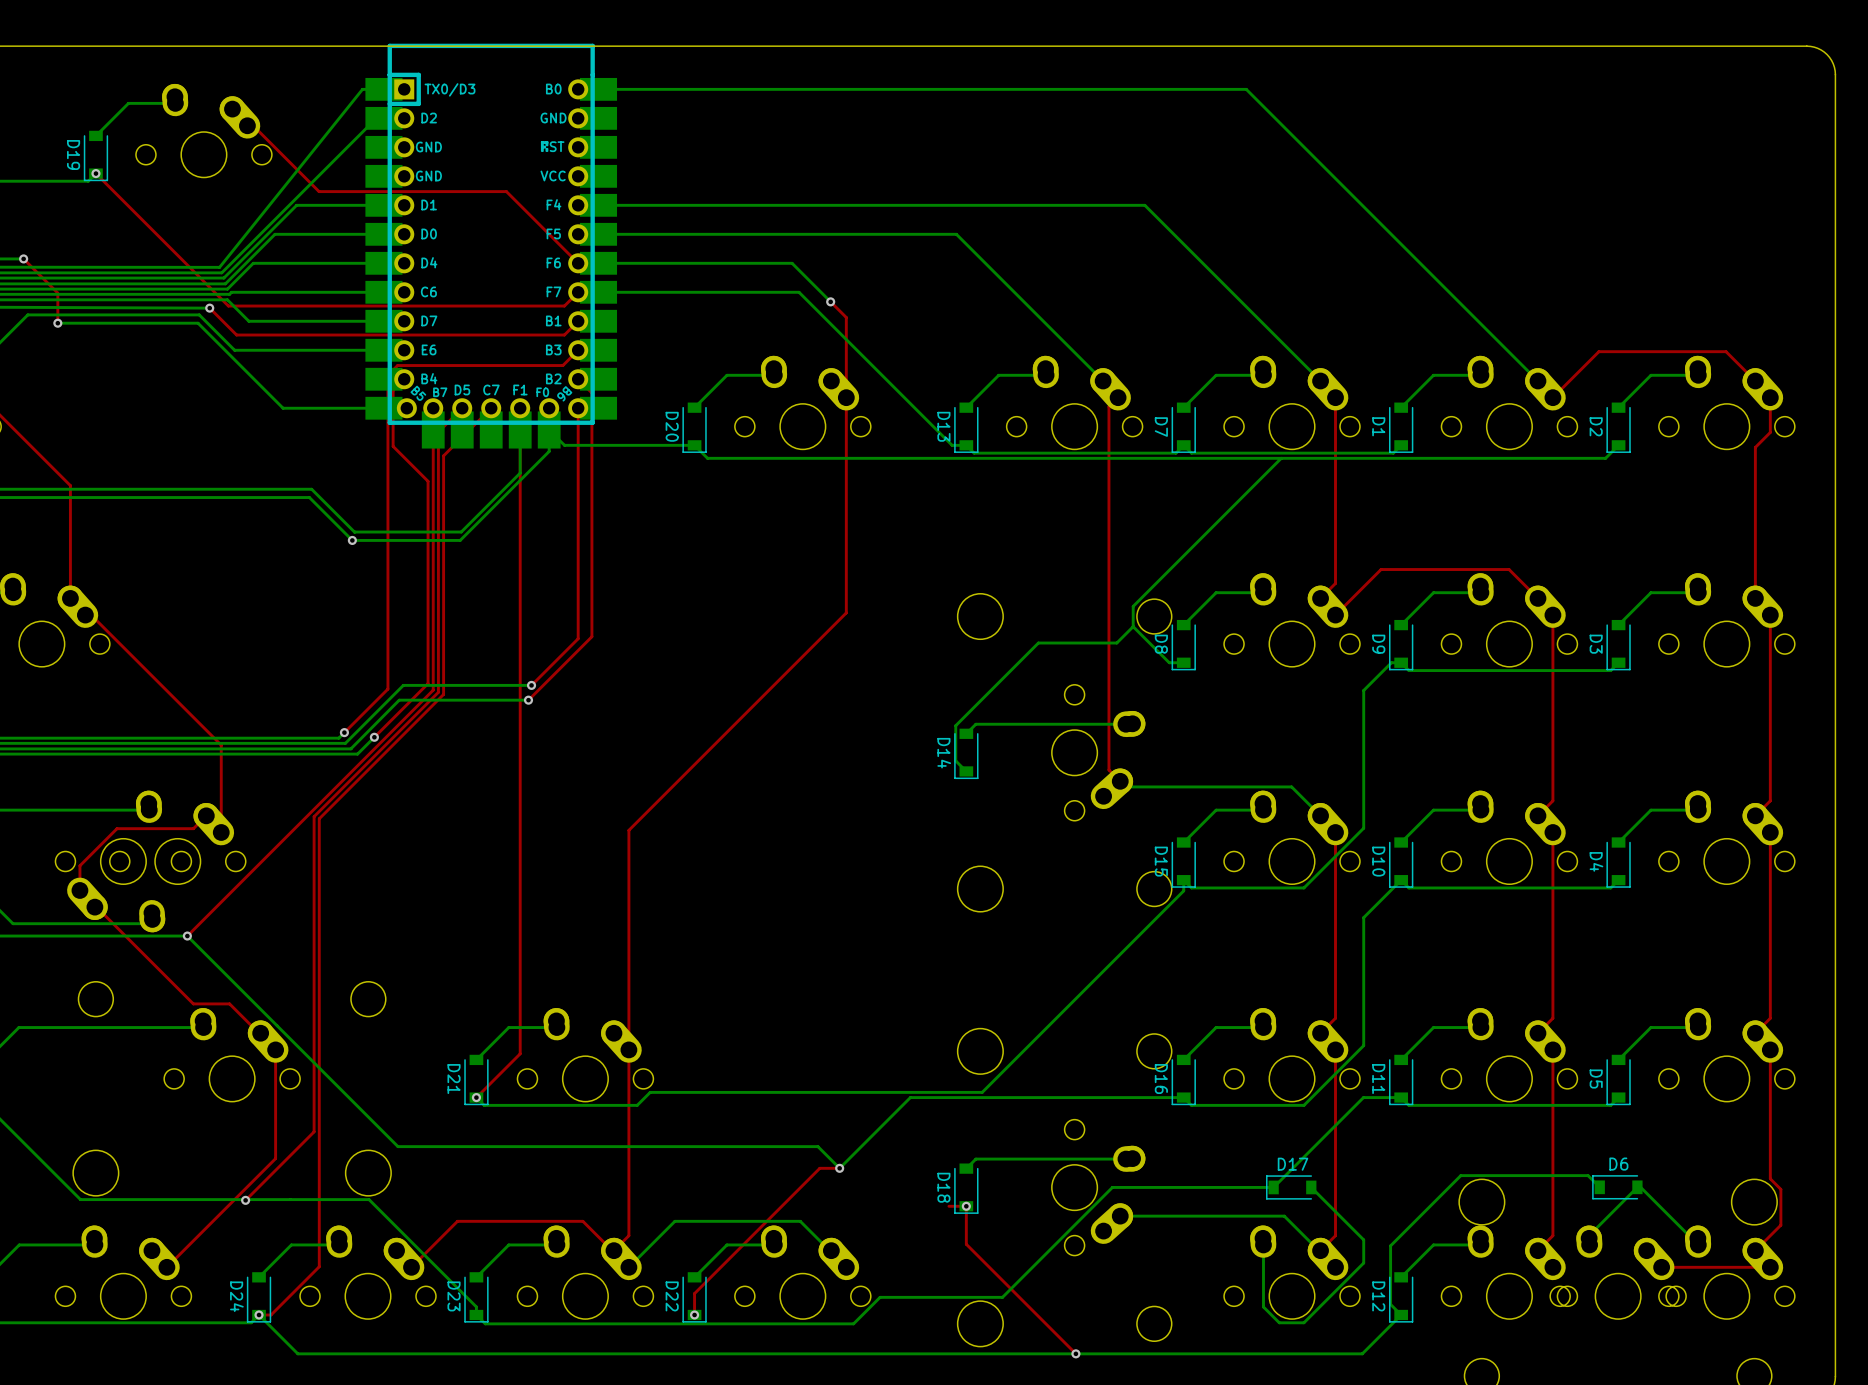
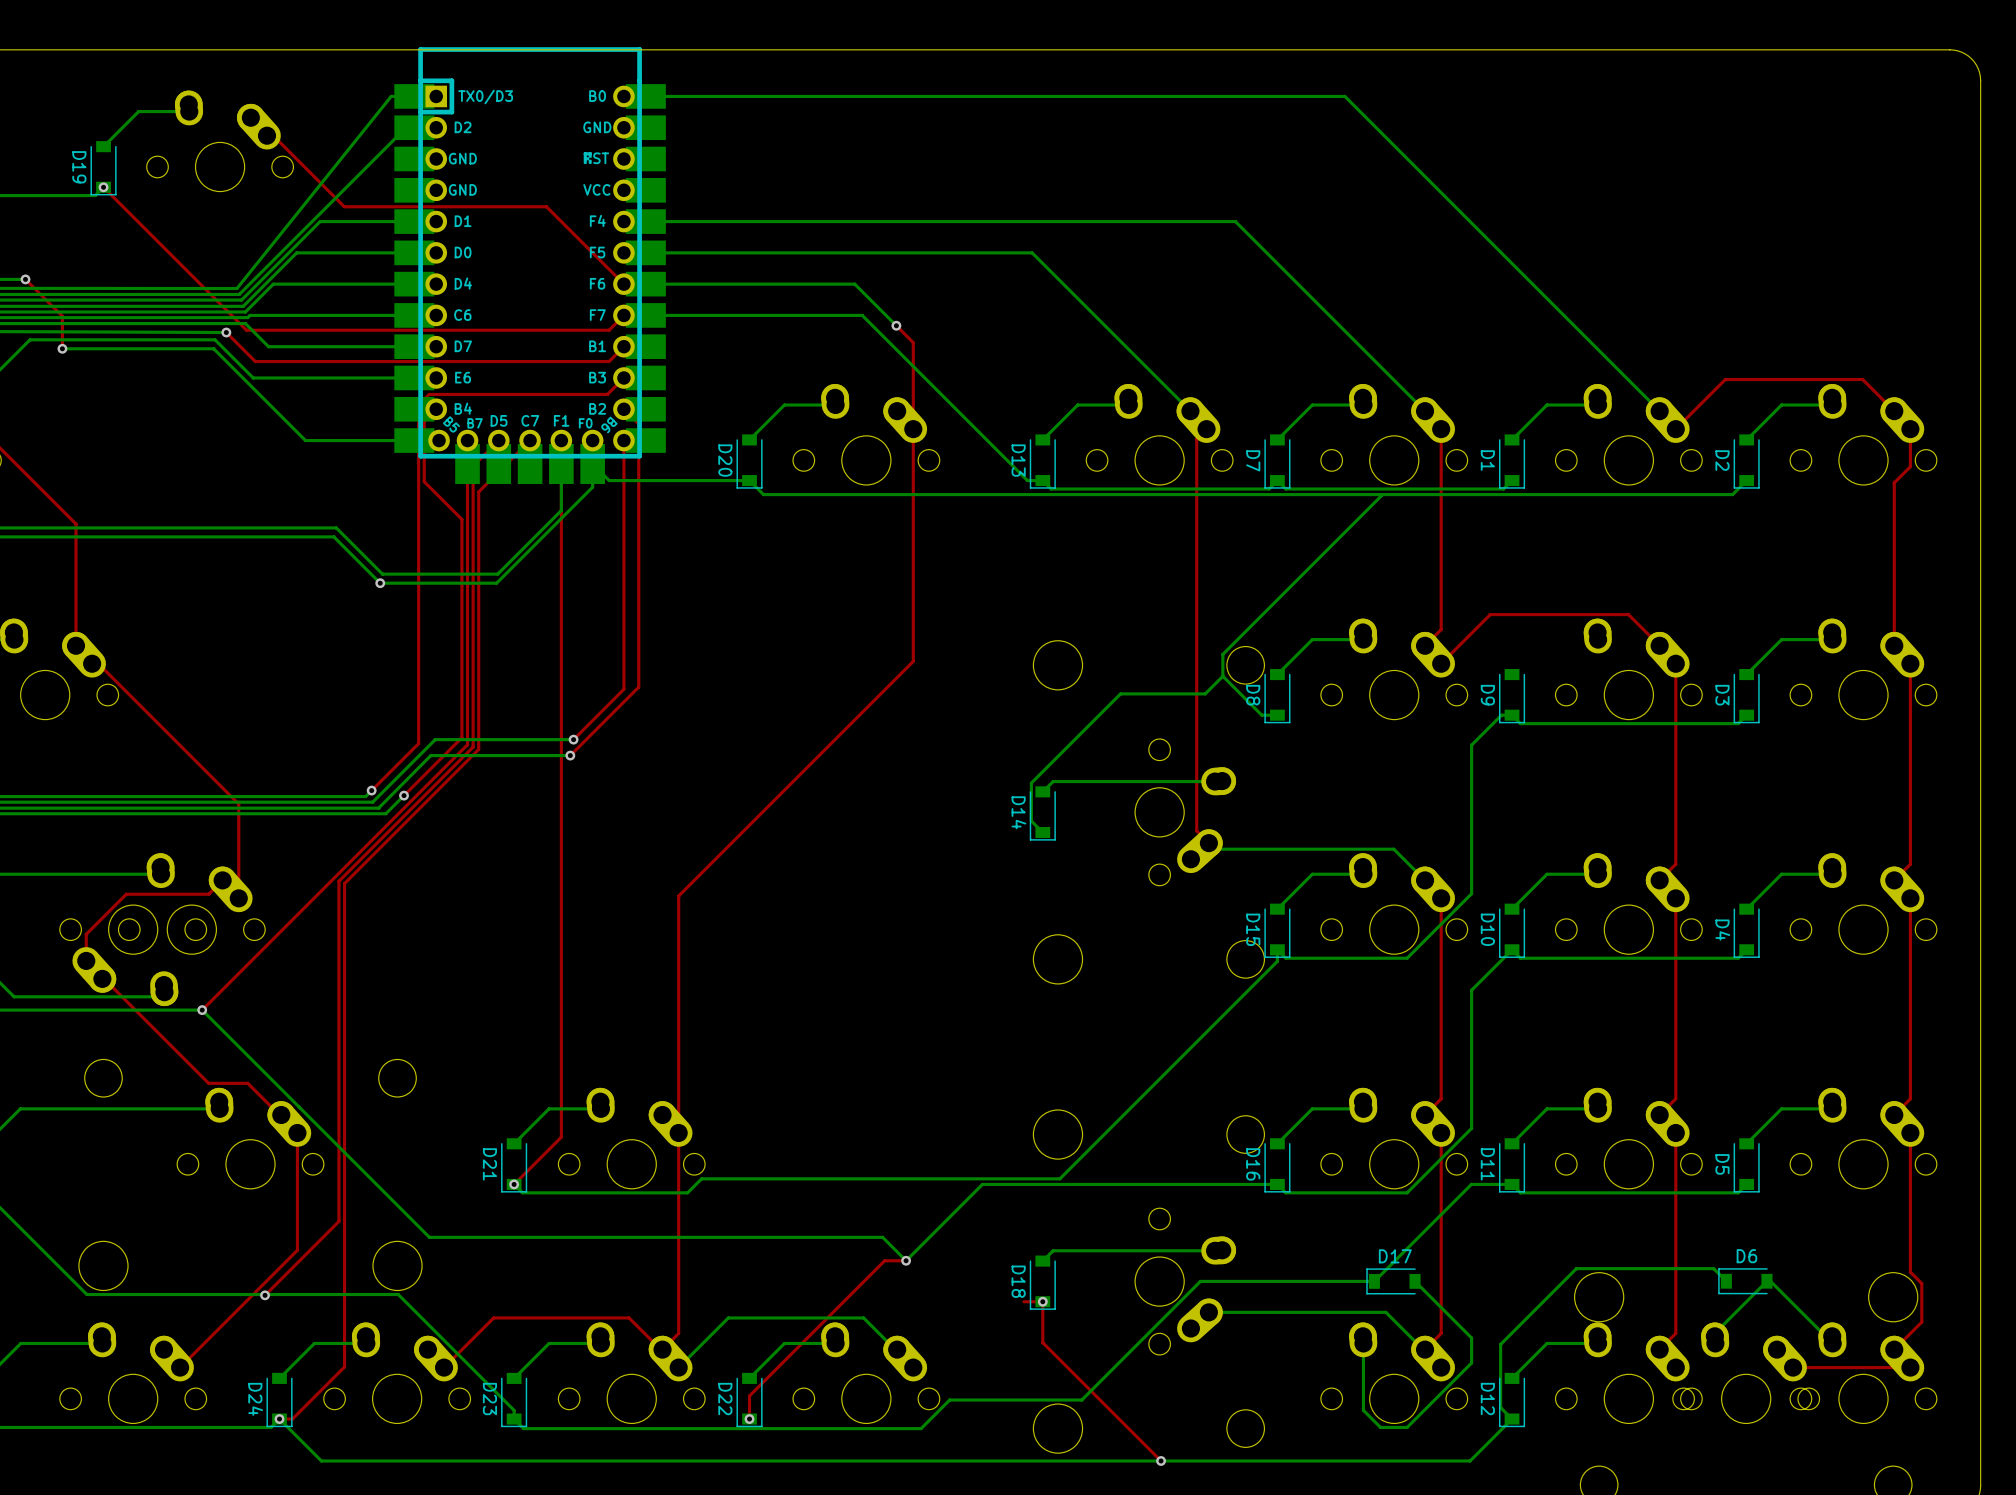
bottom track: (1480, 592) (1433, 592) (1401, 625) -> none

